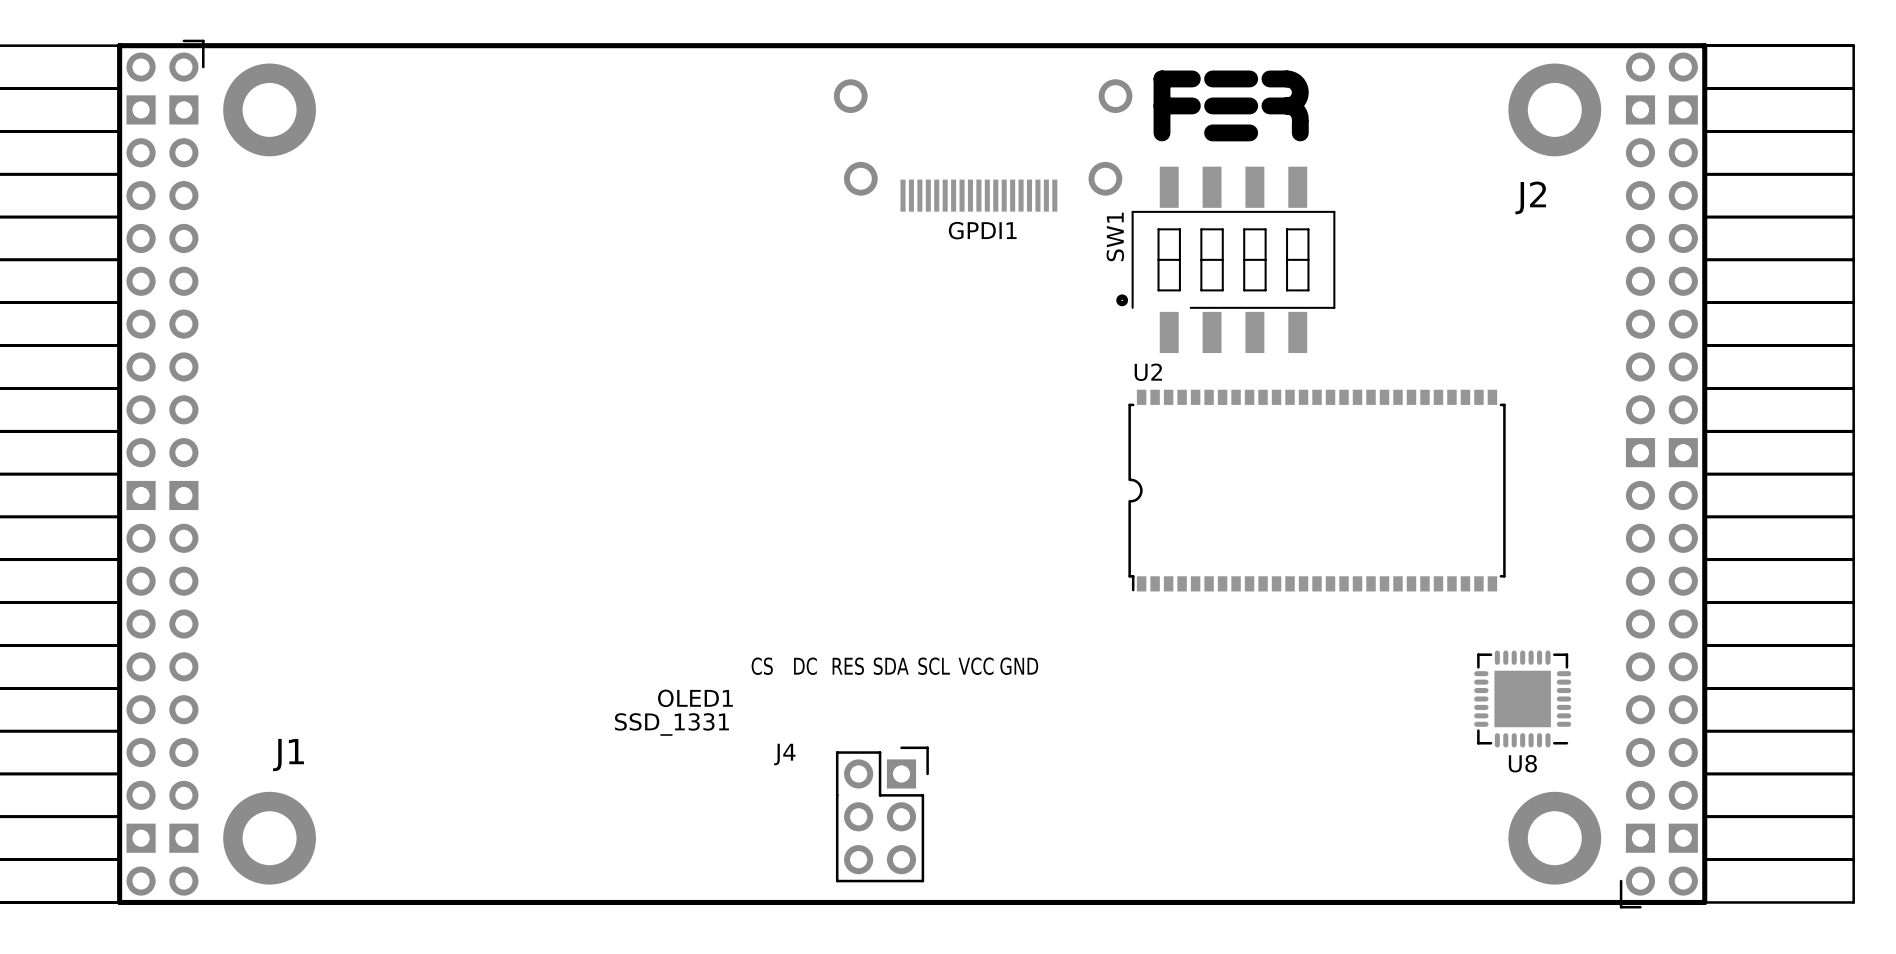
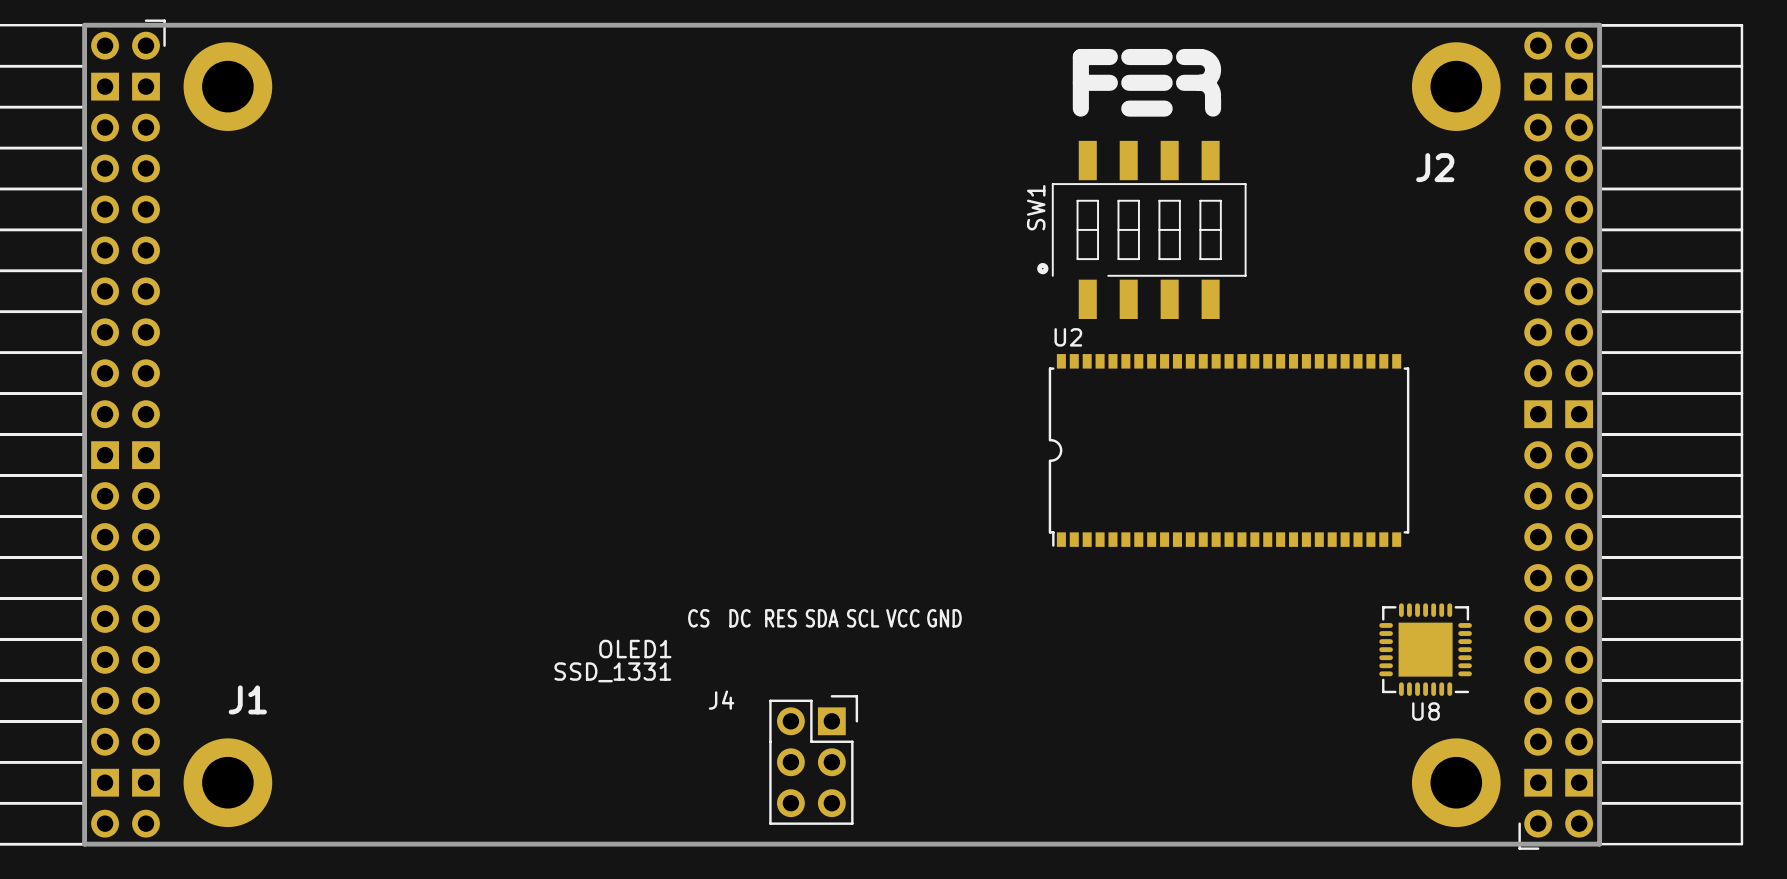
GPDI1: (983, 145) -> none

